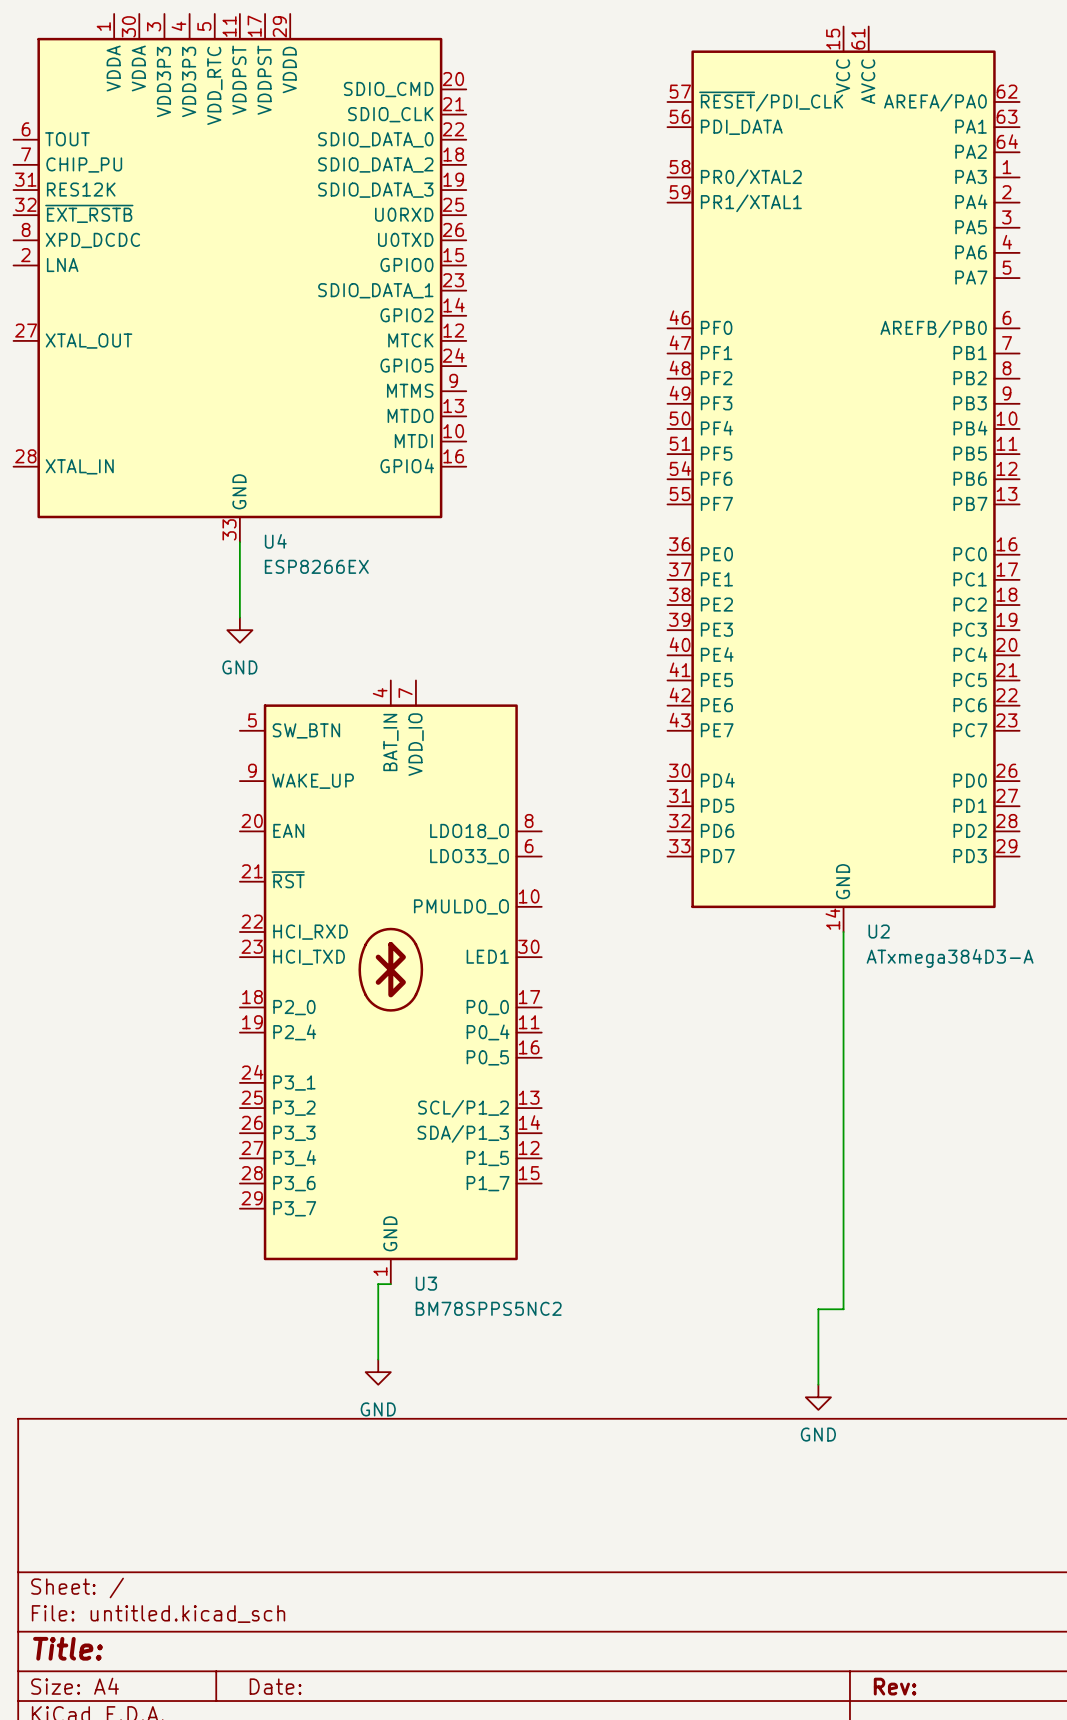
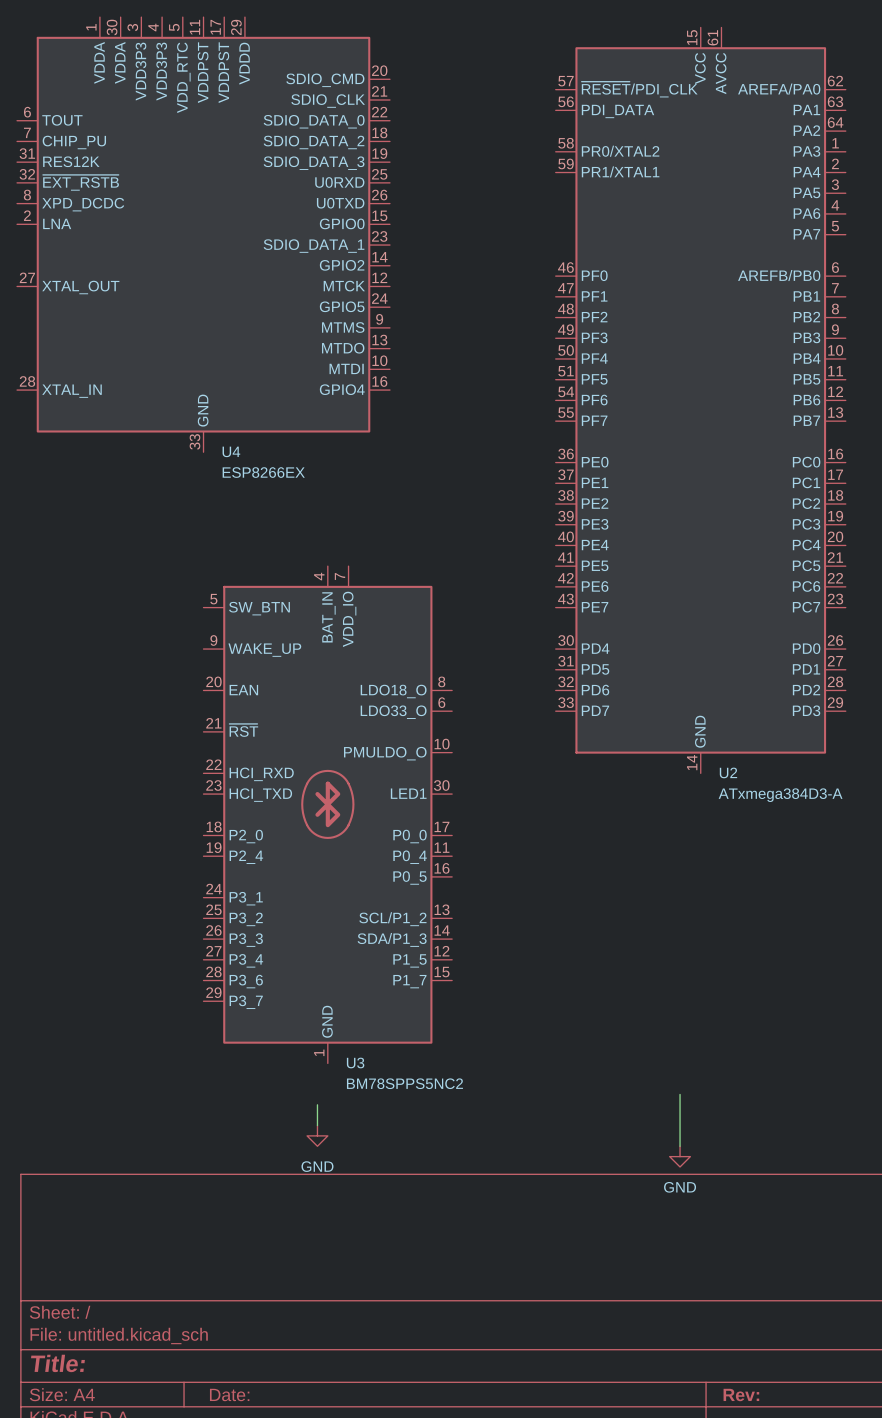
wire: (239, 542) (239, 617) -> none
power symbol: GND (239, 630) -> none
wire: (843, 932) (843, 1309) (818, 1309) (818, 1321) -> none
wire: (390, 1284) (378, 1284) (378, 1334) -> none

